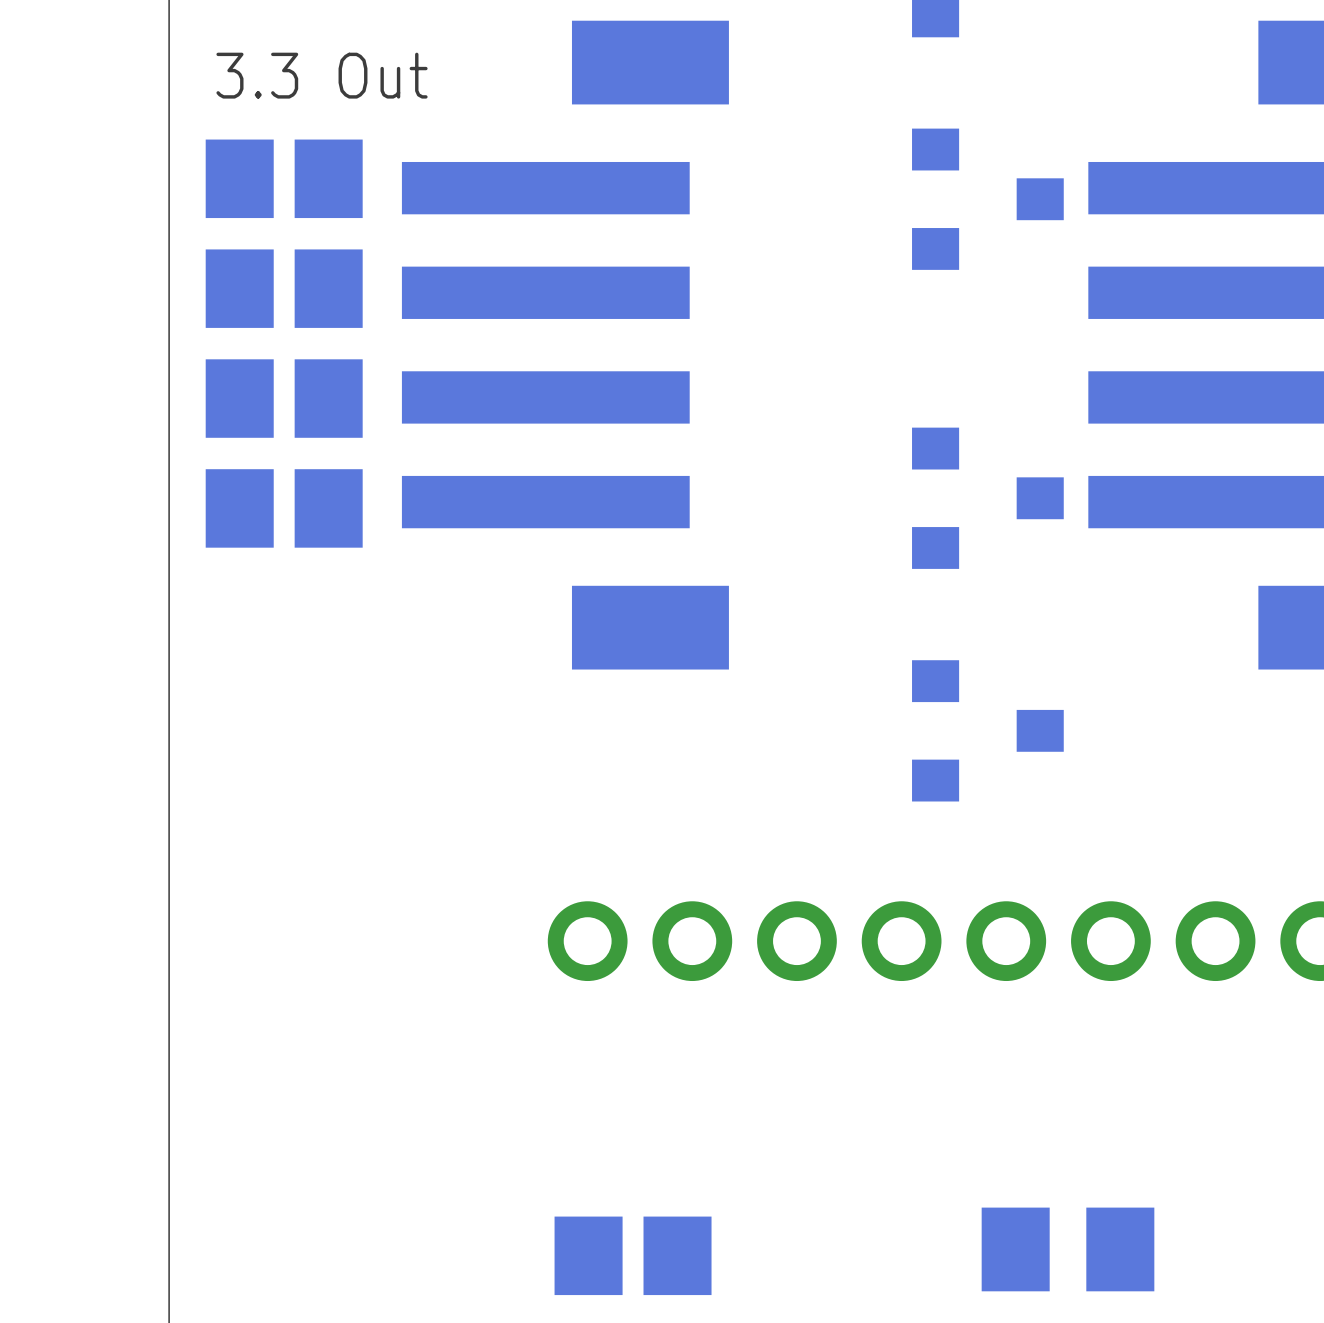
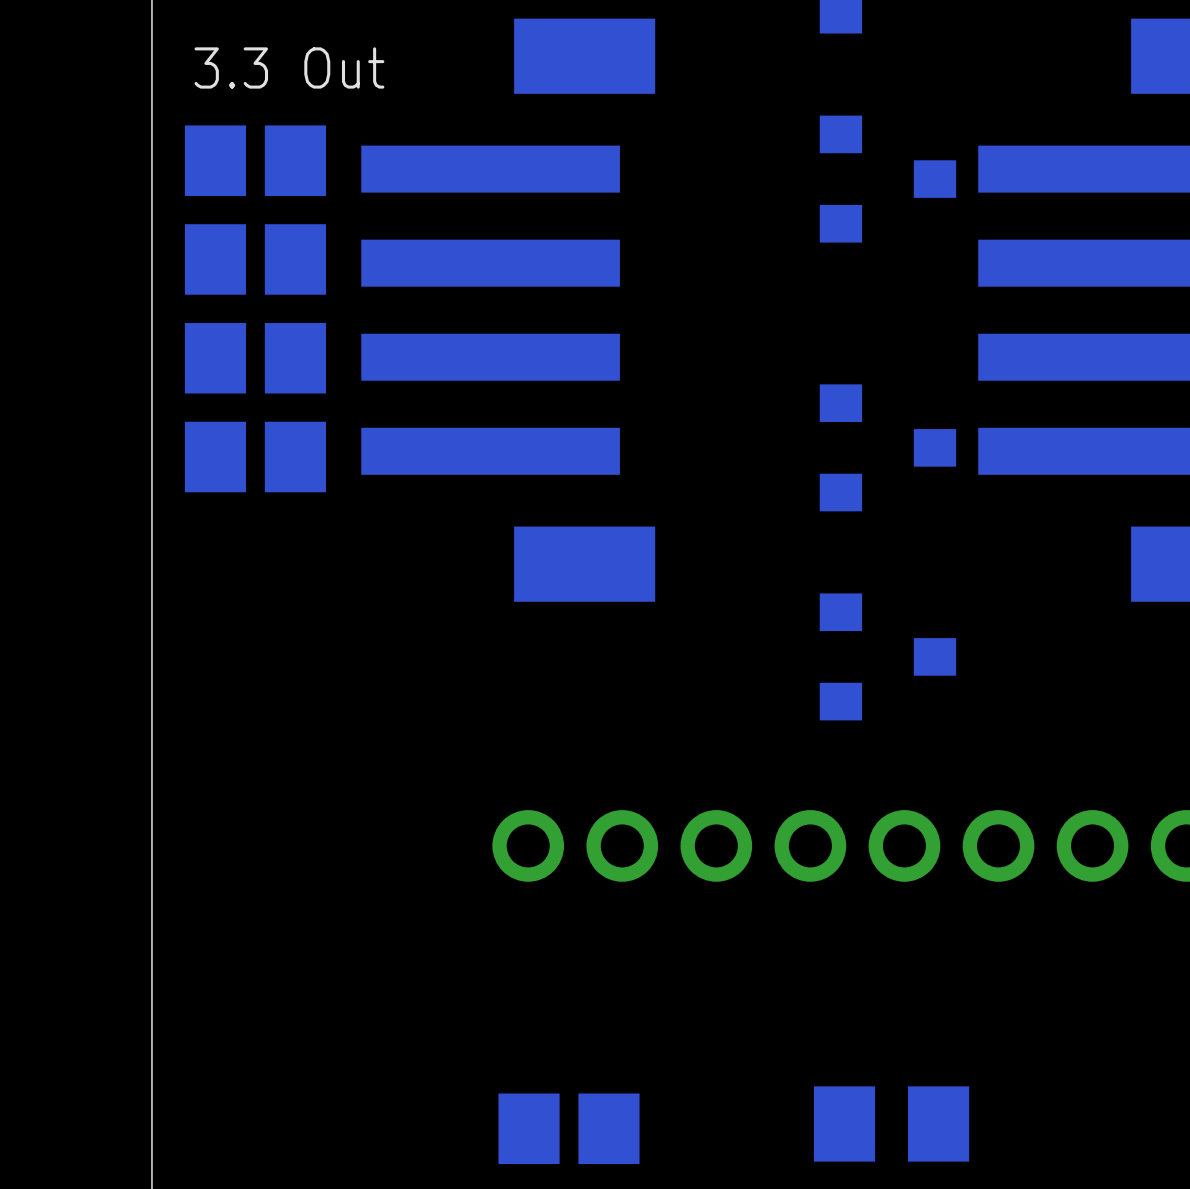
part position: (1068, 1249) -> (891, 1123)

